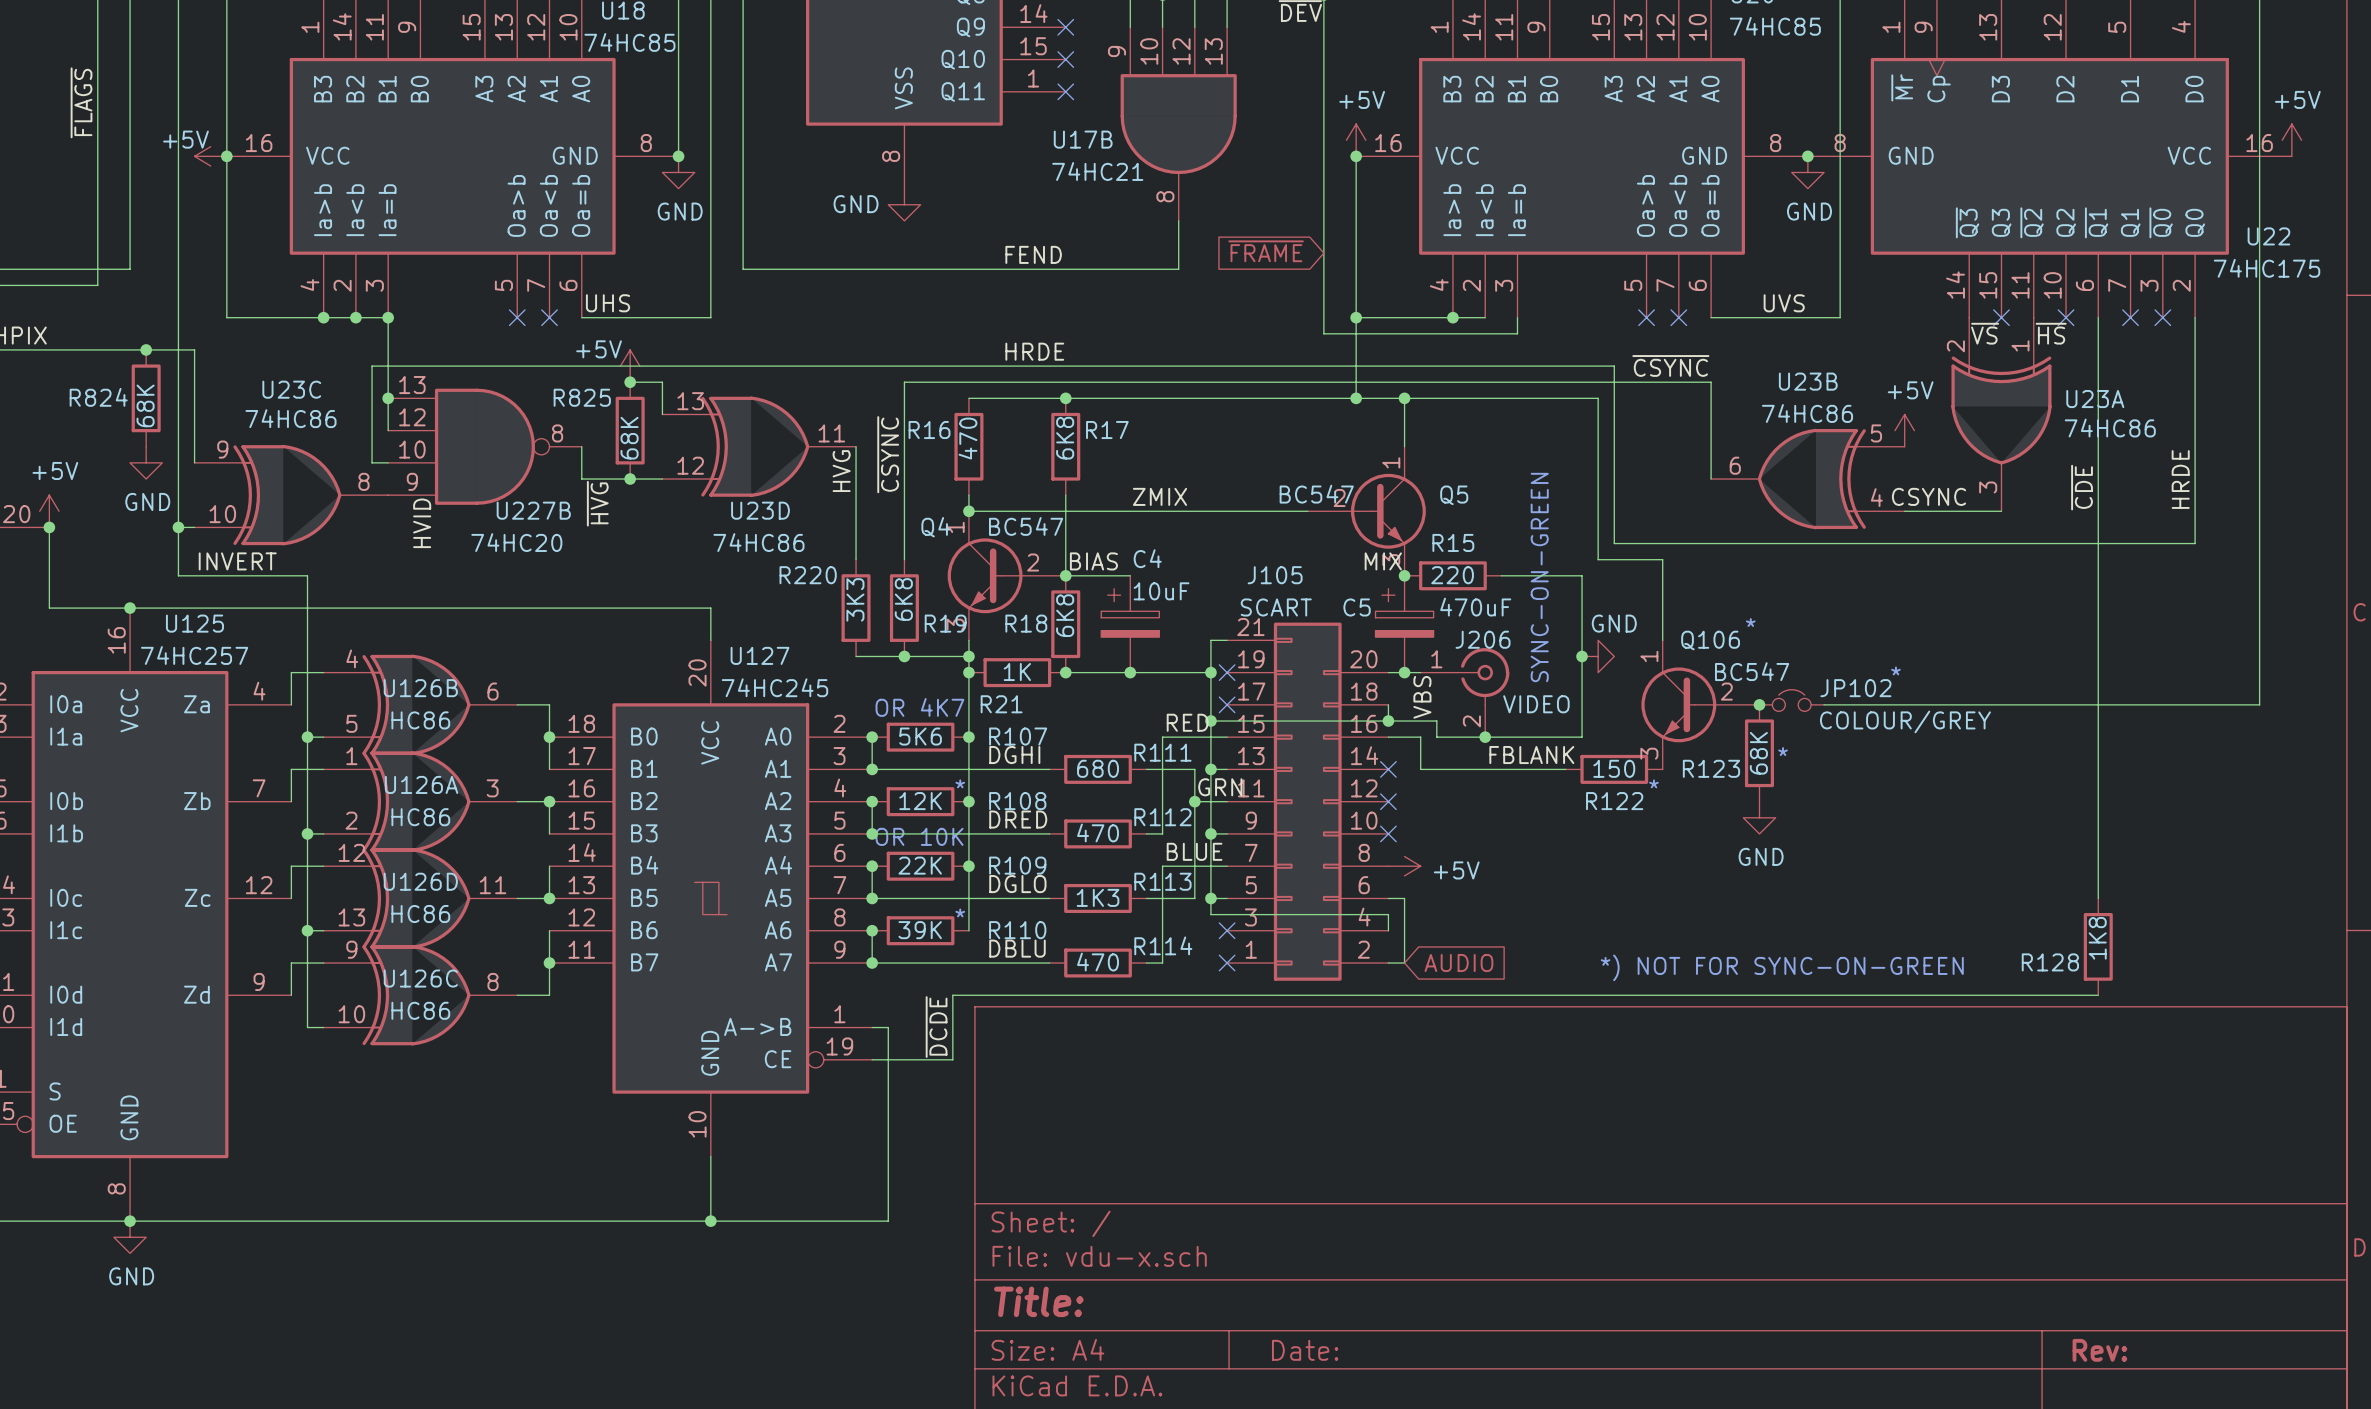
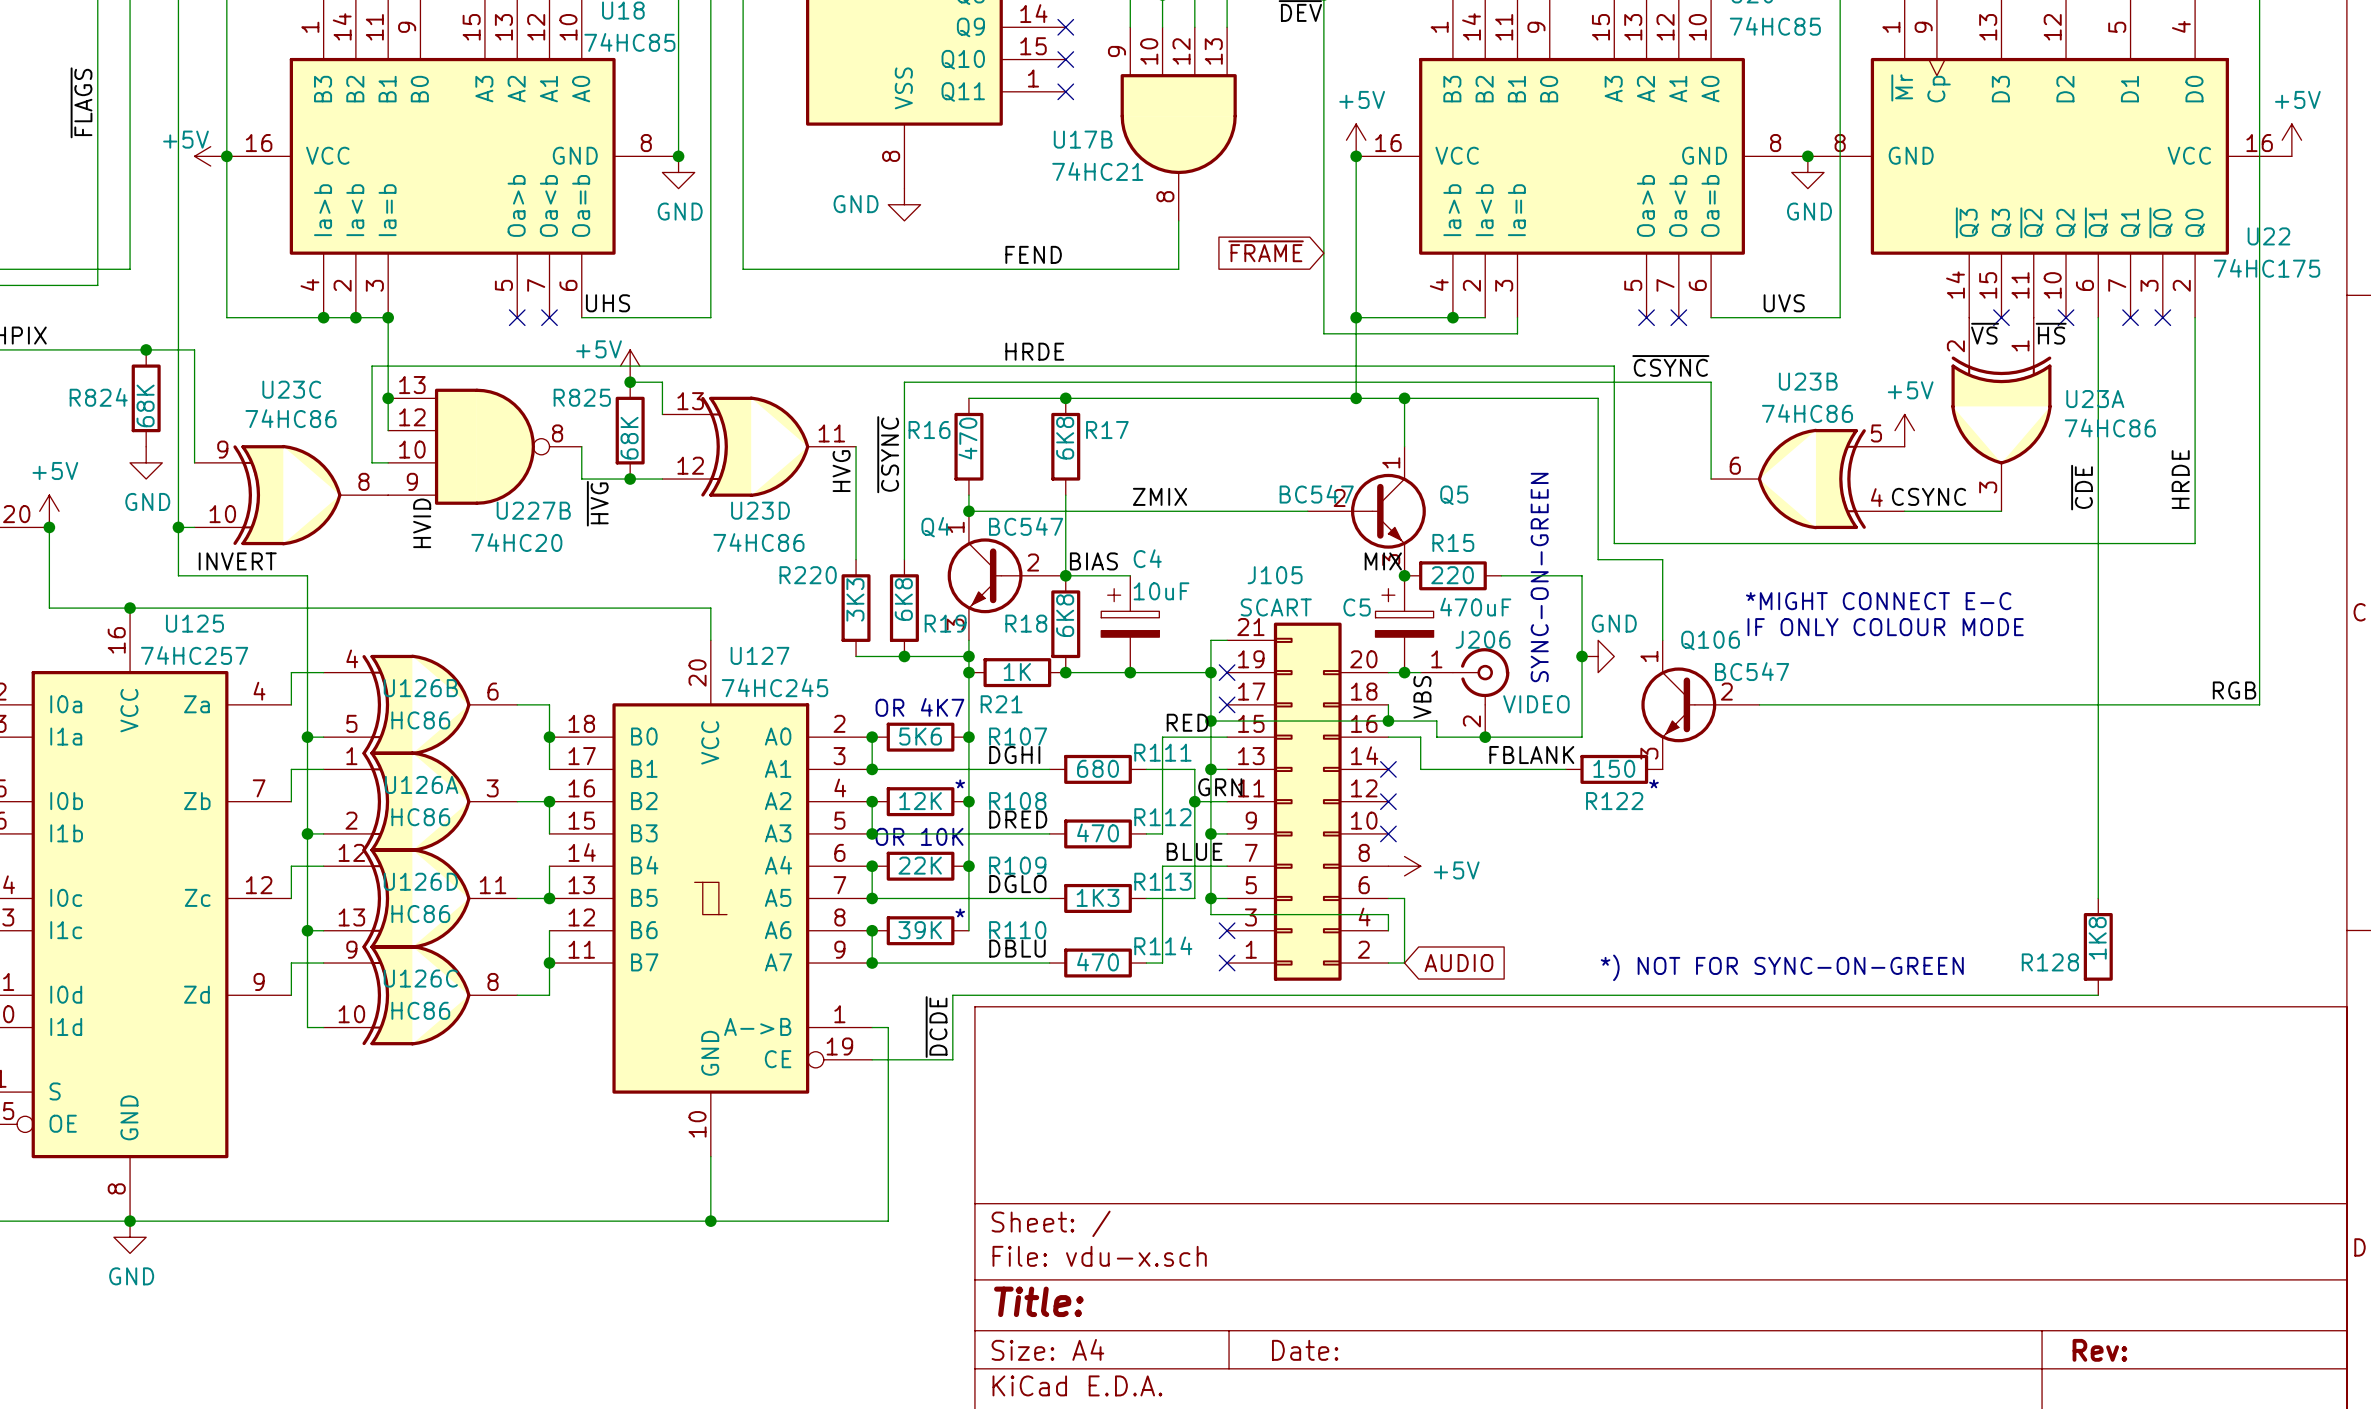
text: none -> *MIGHT CONNECT E-C (1878, 601)
text: * (1750, 622) -> IF ONLY COLOUR MODE (1885, 627)
text: * (1895, 670) -> none
label: none -> RGB (2234, 690)
JP102: COLOUR/GREY (1791, 700) -> none
wire: none -> (1759, 704) (1824, 704)
junction: (1759, 704) -> none
text: * (1783, 751) -> none
R123: 68K (1759, 753) -> none
power symbol: GND (1759, 817) -> none

